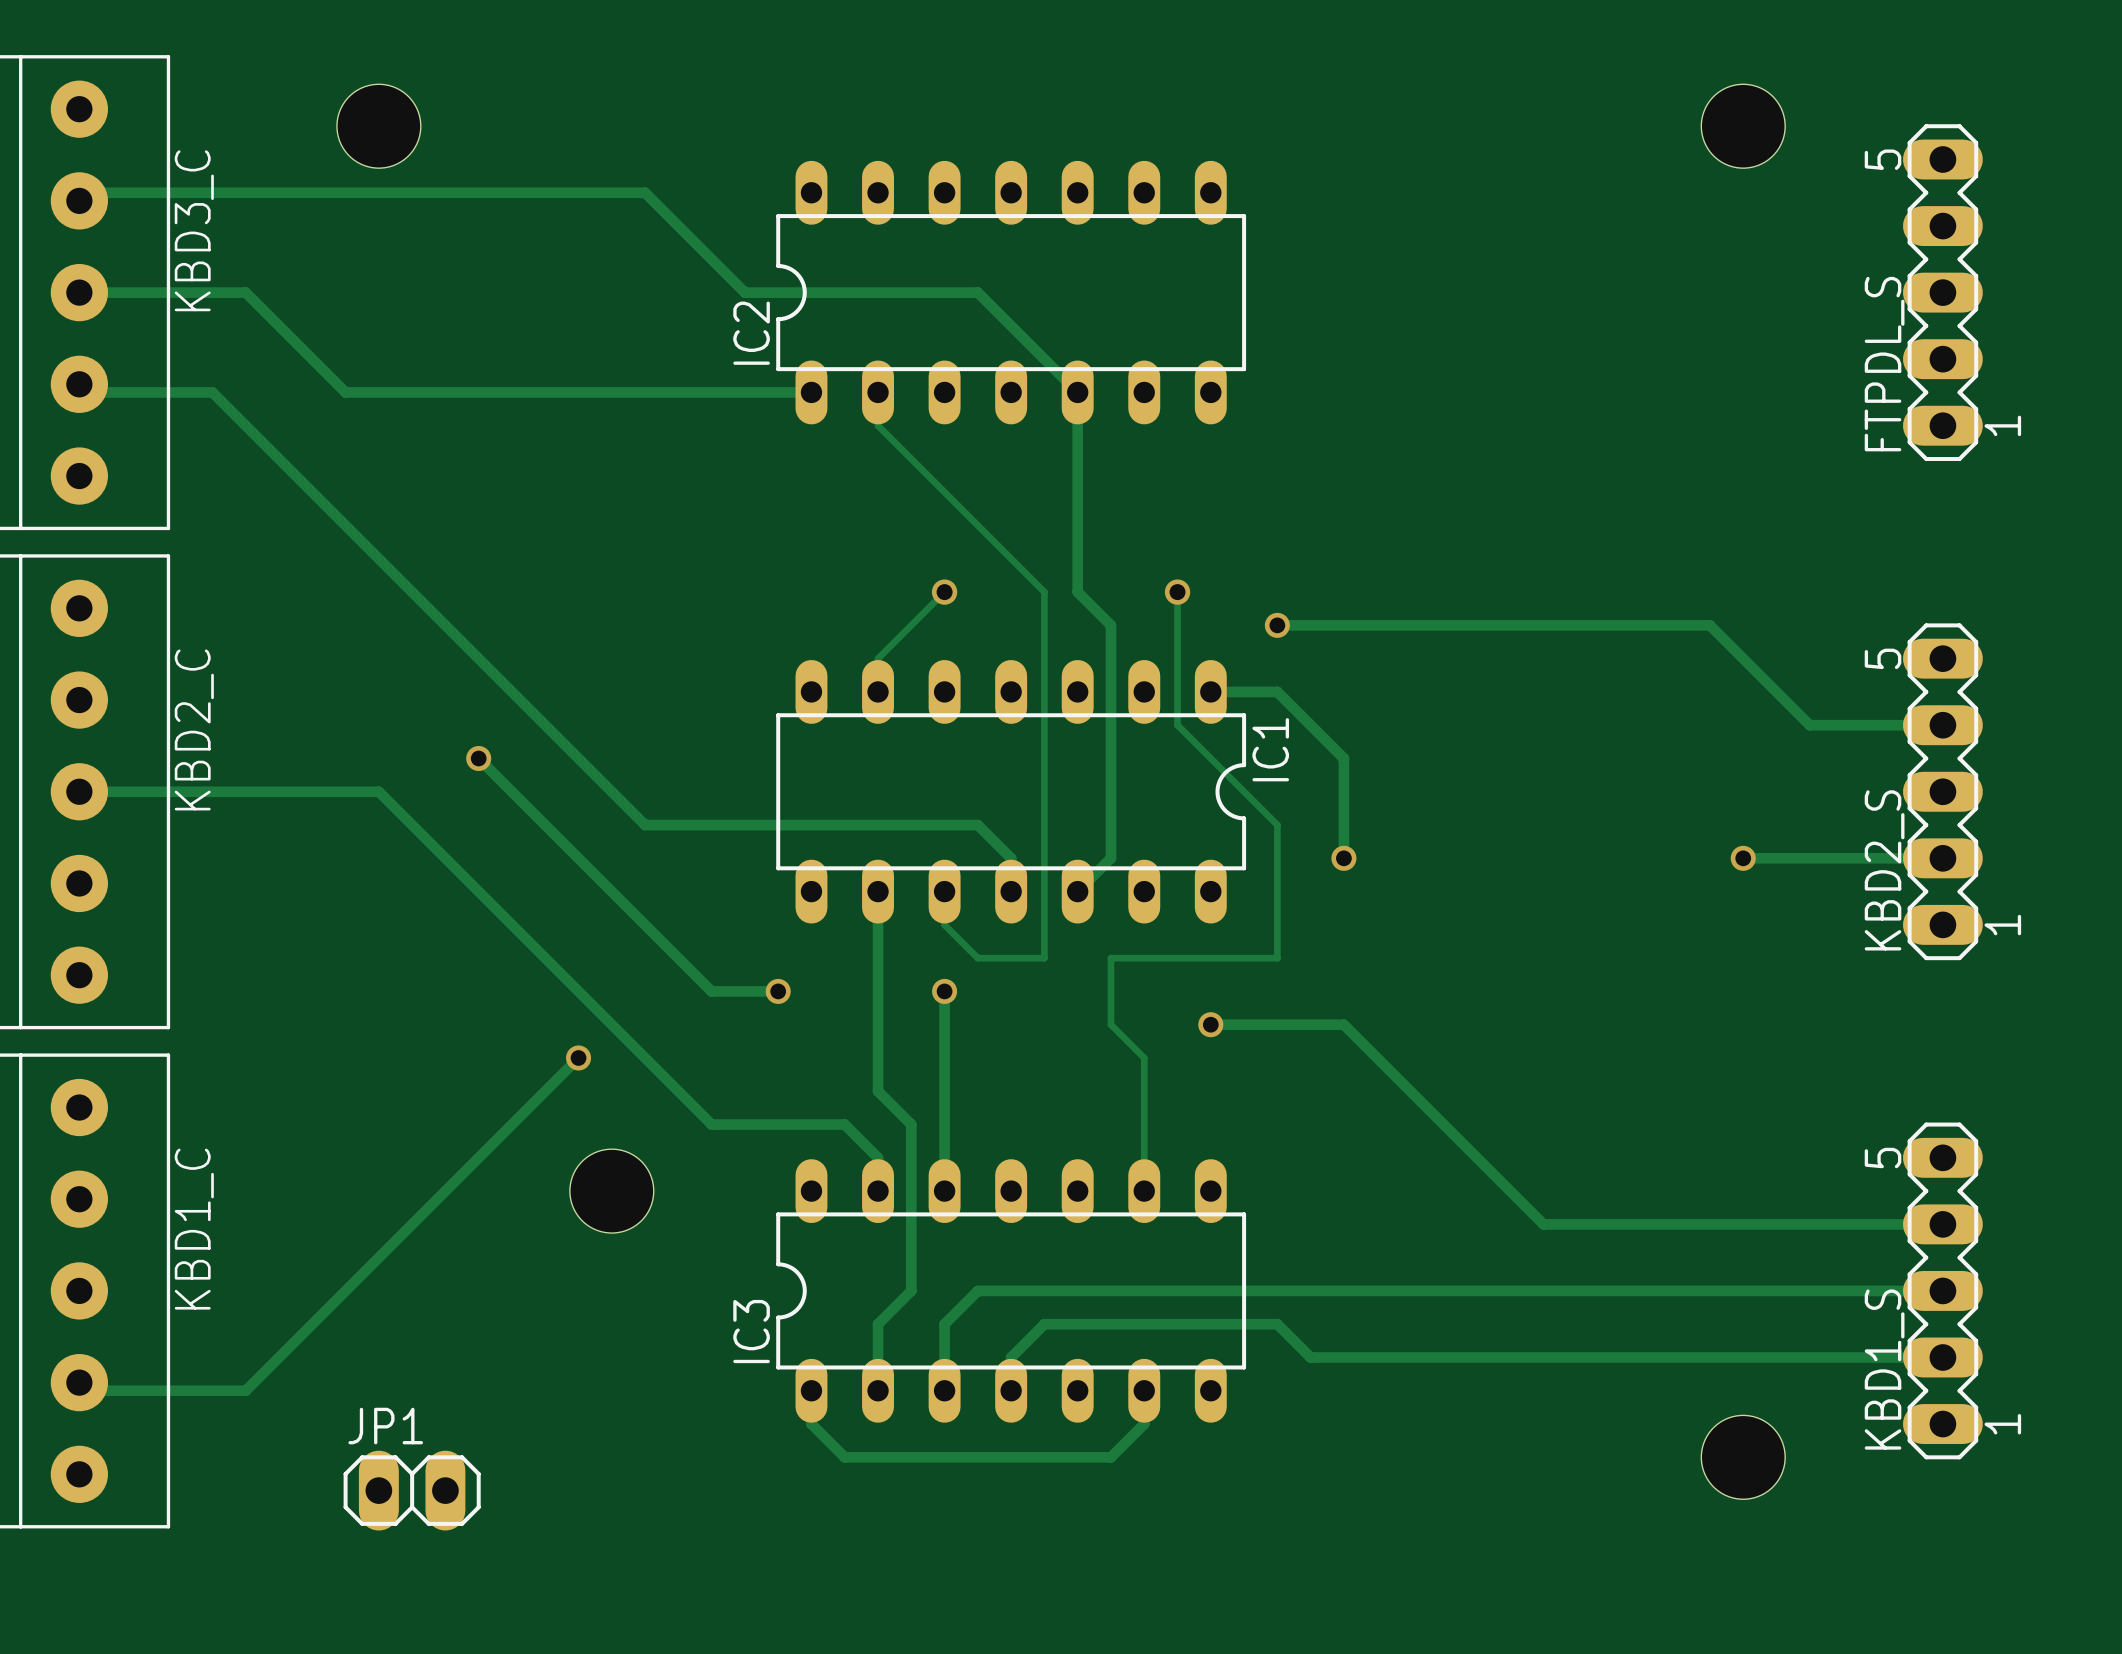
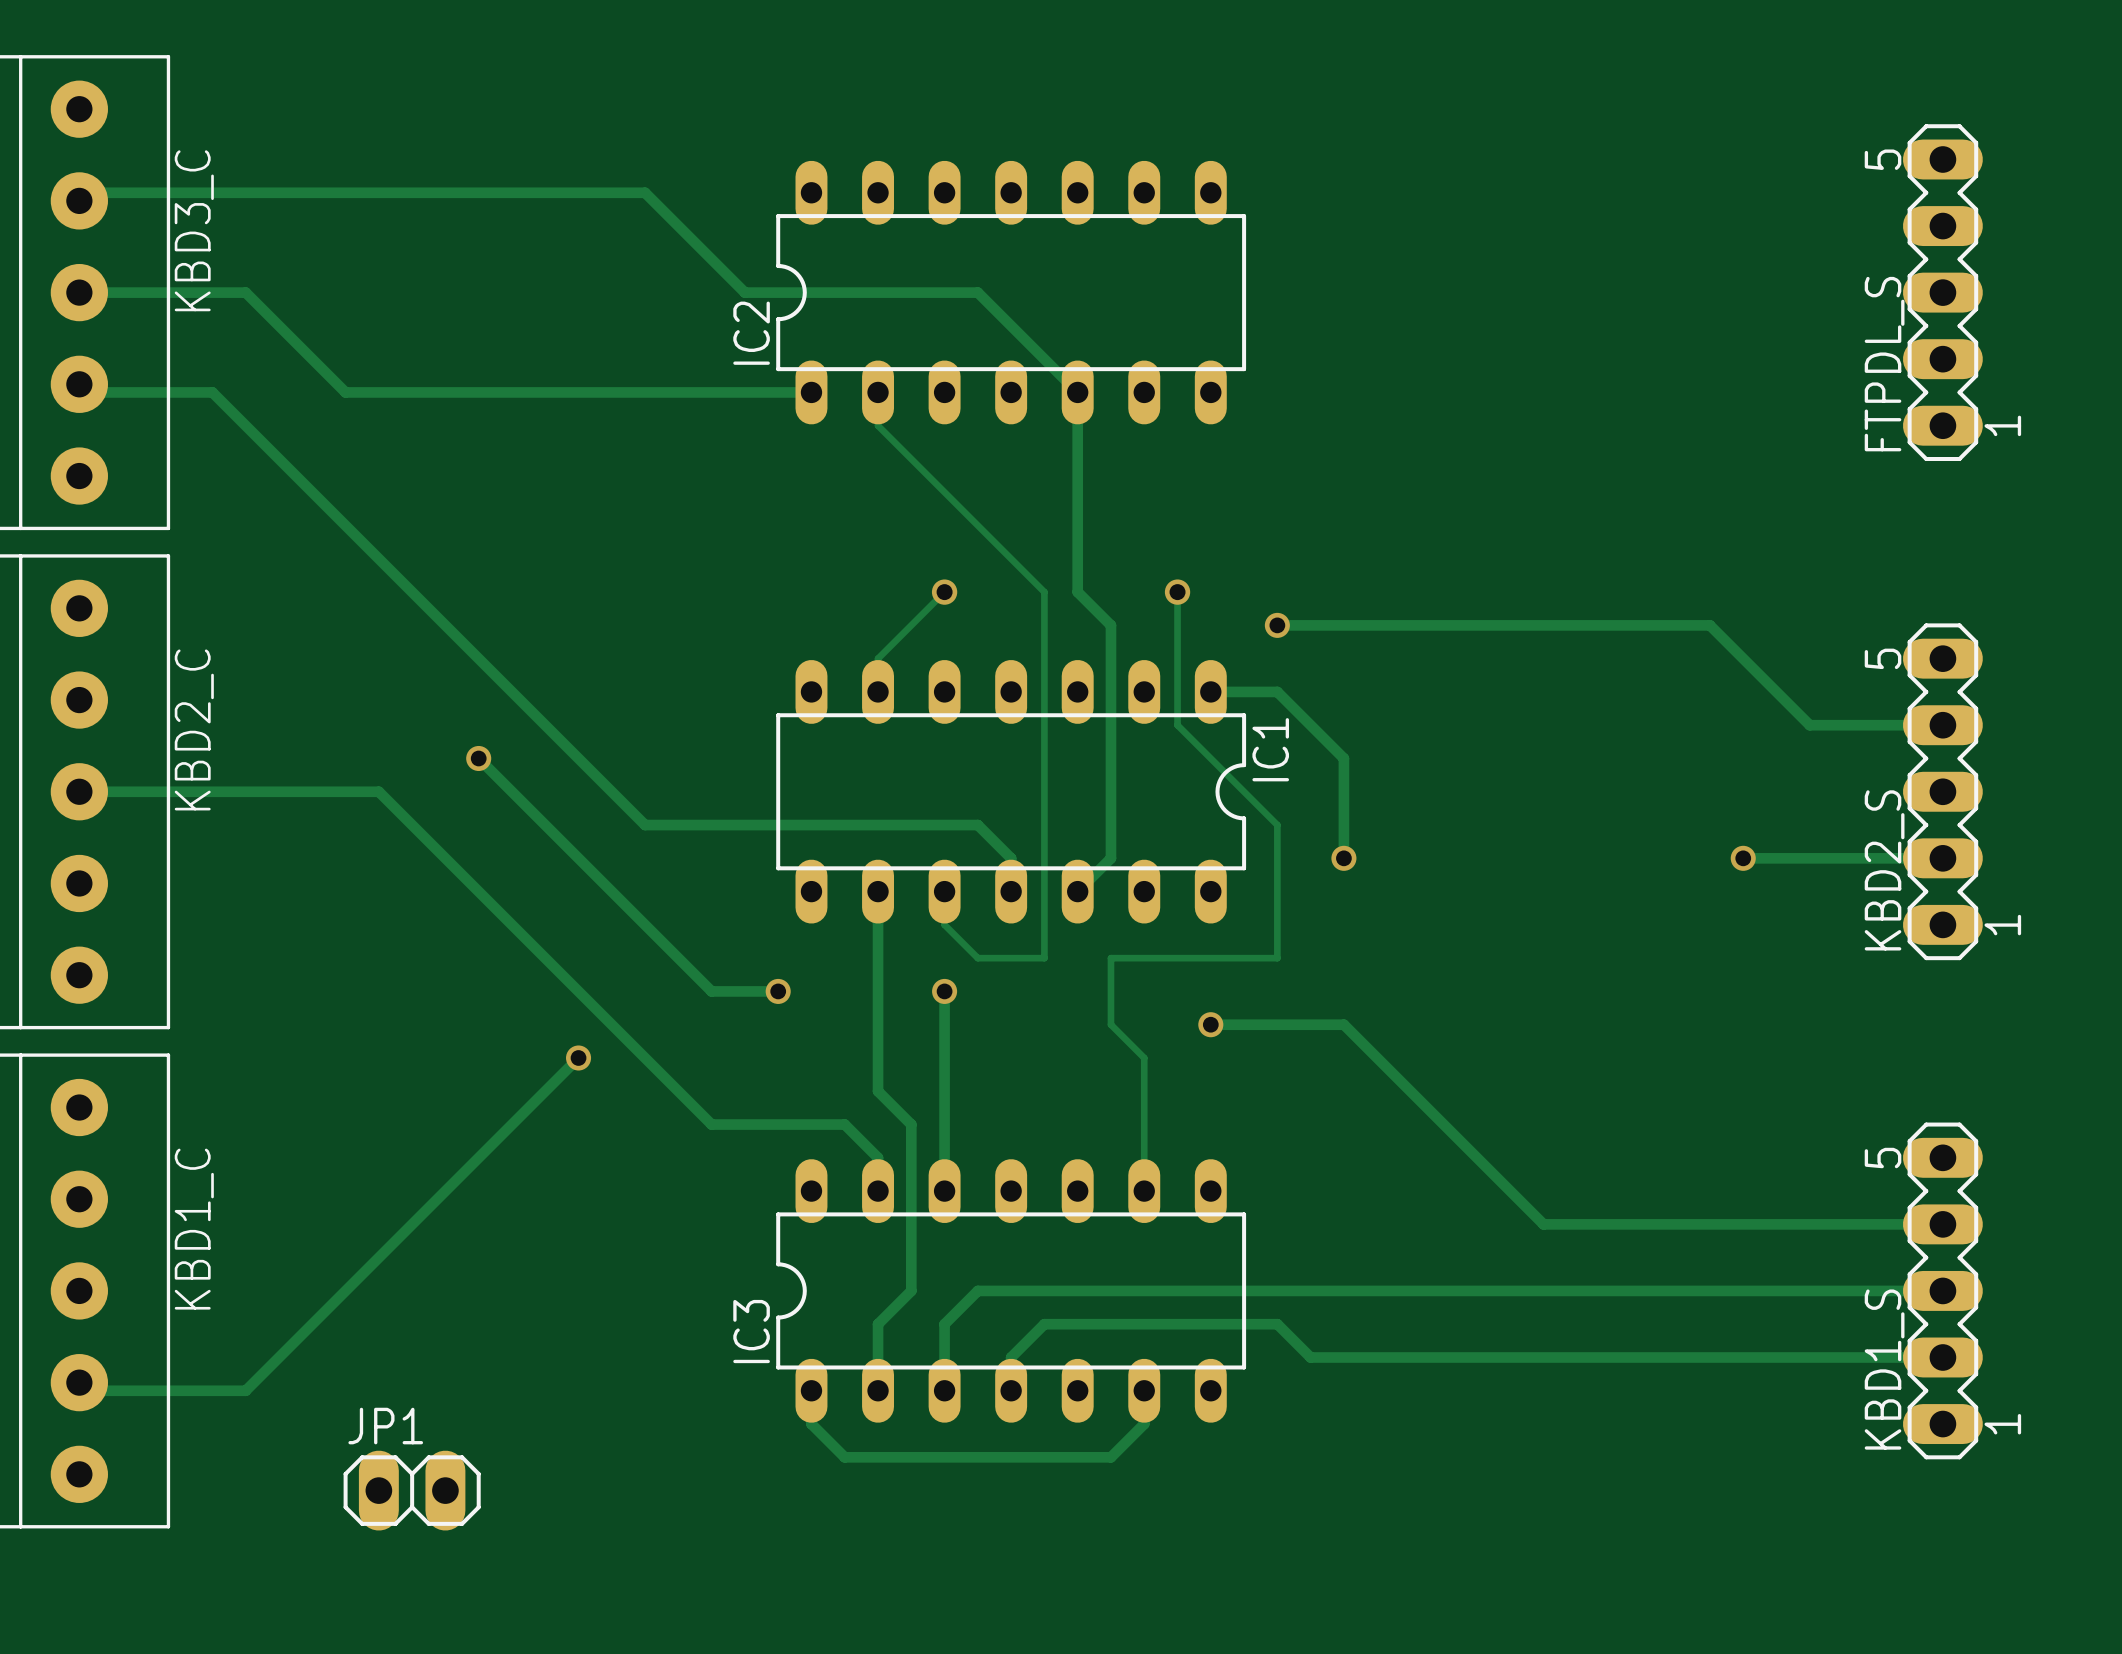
hole: (378, 126) -> none
hole: (1743, 126) -> none
hole: (611, 1191) -> none
hole: (1743, 1457) -> none

